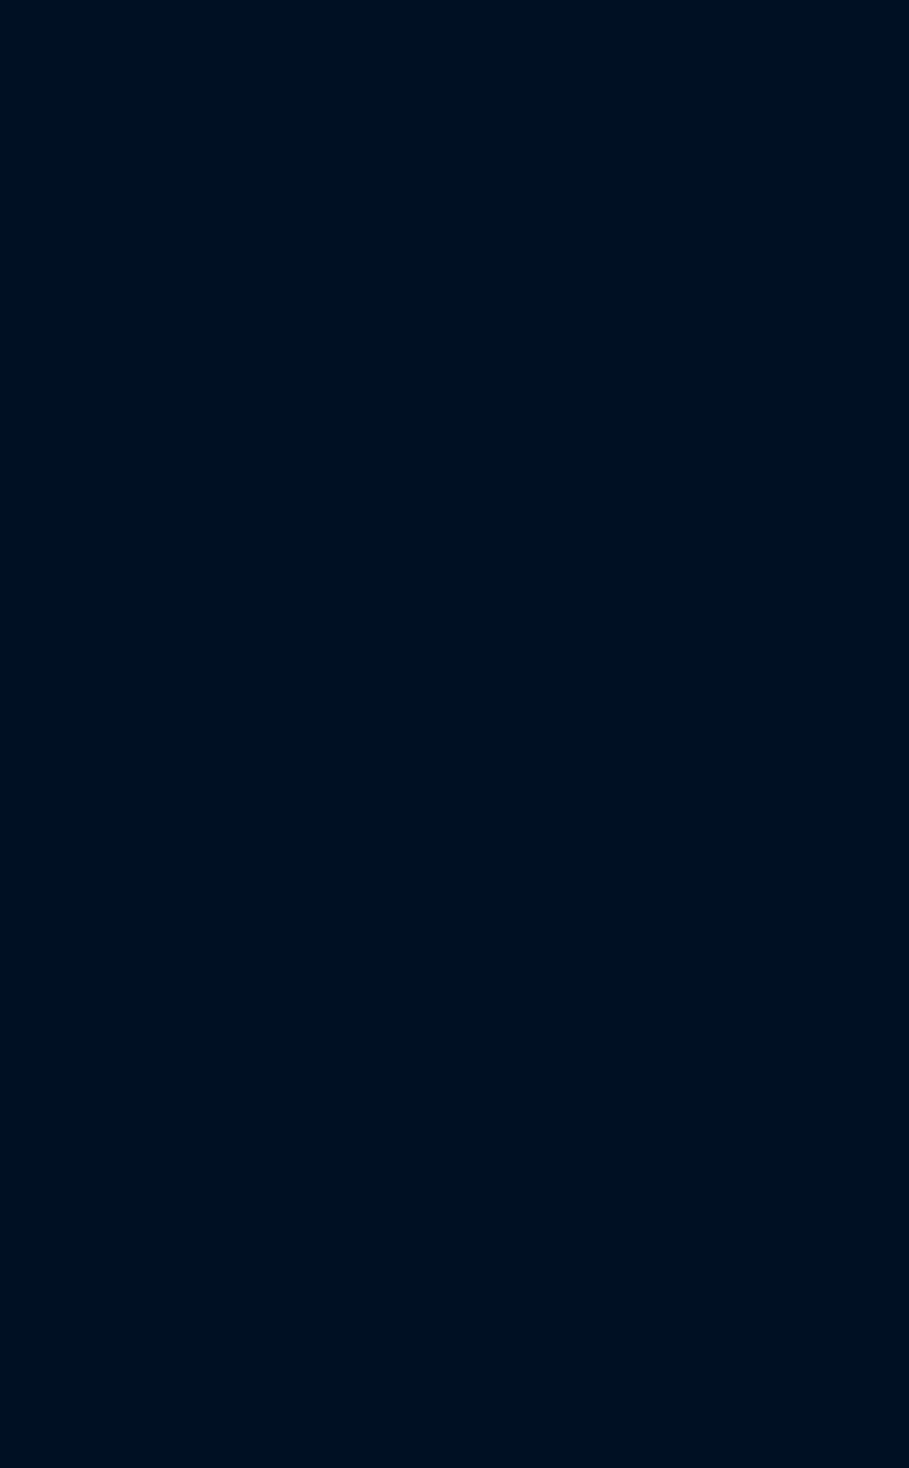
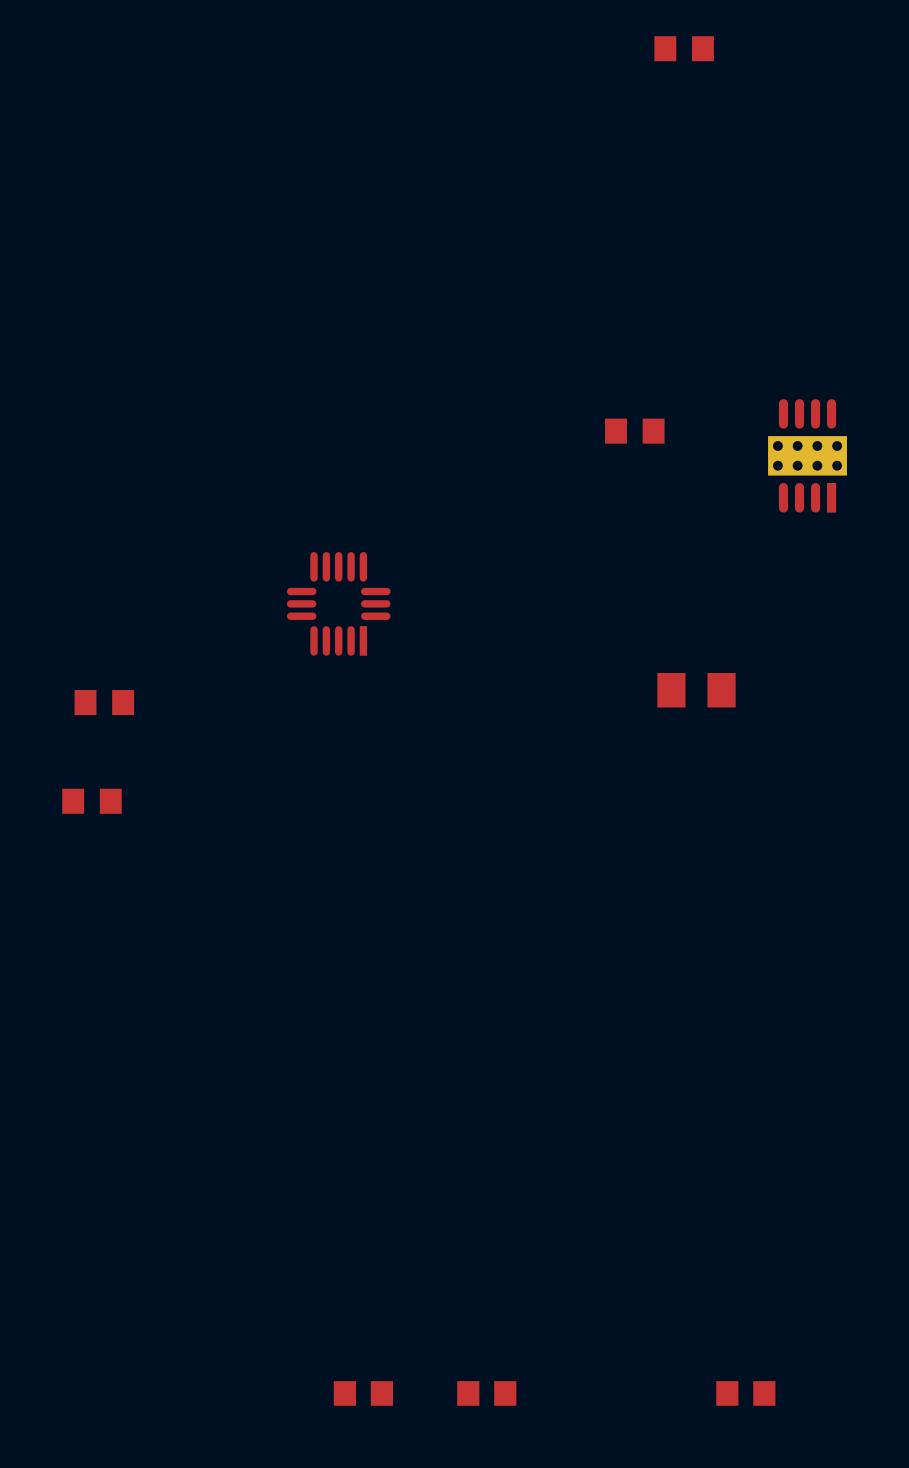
part: none -> (684, 48)
part: none -> (634, 431)
part: none -> (807, 455)
part: none -> (338, 603)
part: none -> (696, 690)
part: none -> (104, 702)
part: none -> (91, 801)
part: none -> (363, 1393)
part: none -> (486, 1393)
part: none -> (745, 1393)

